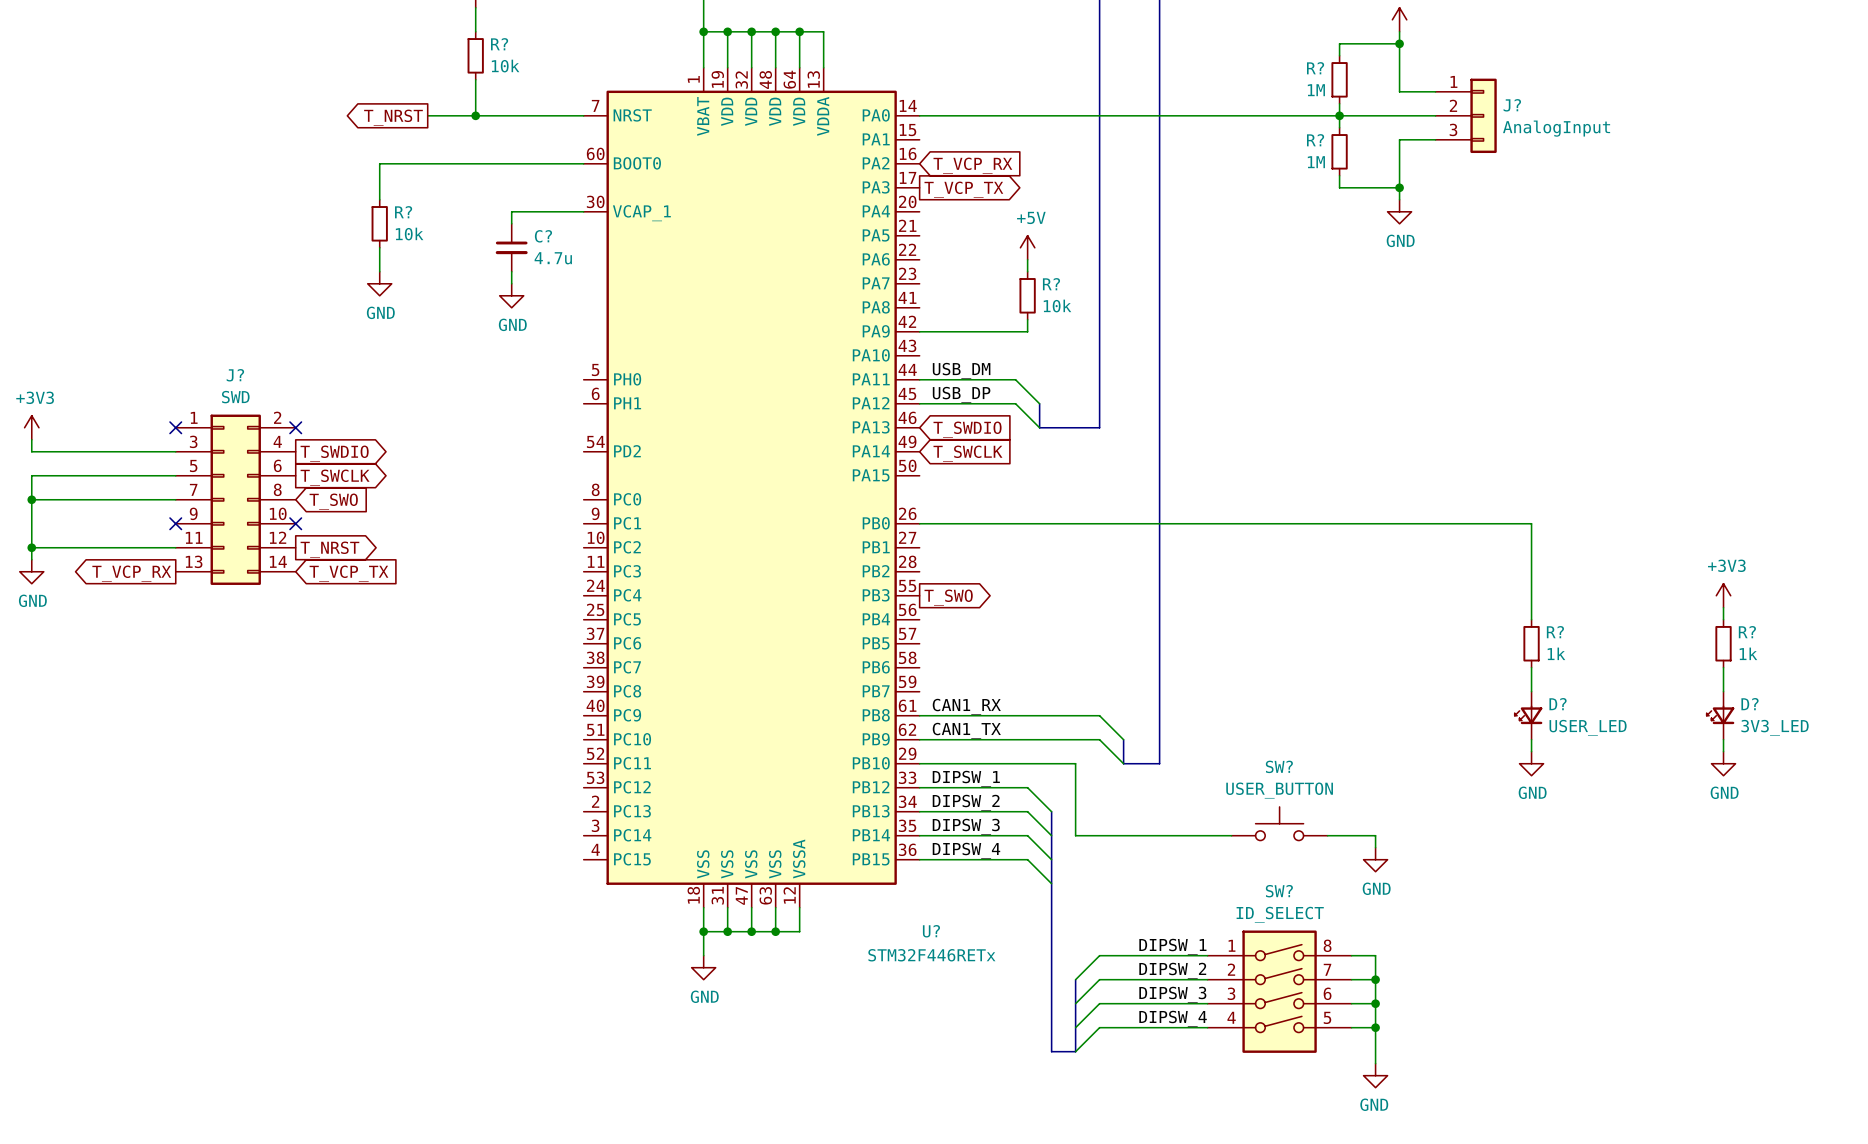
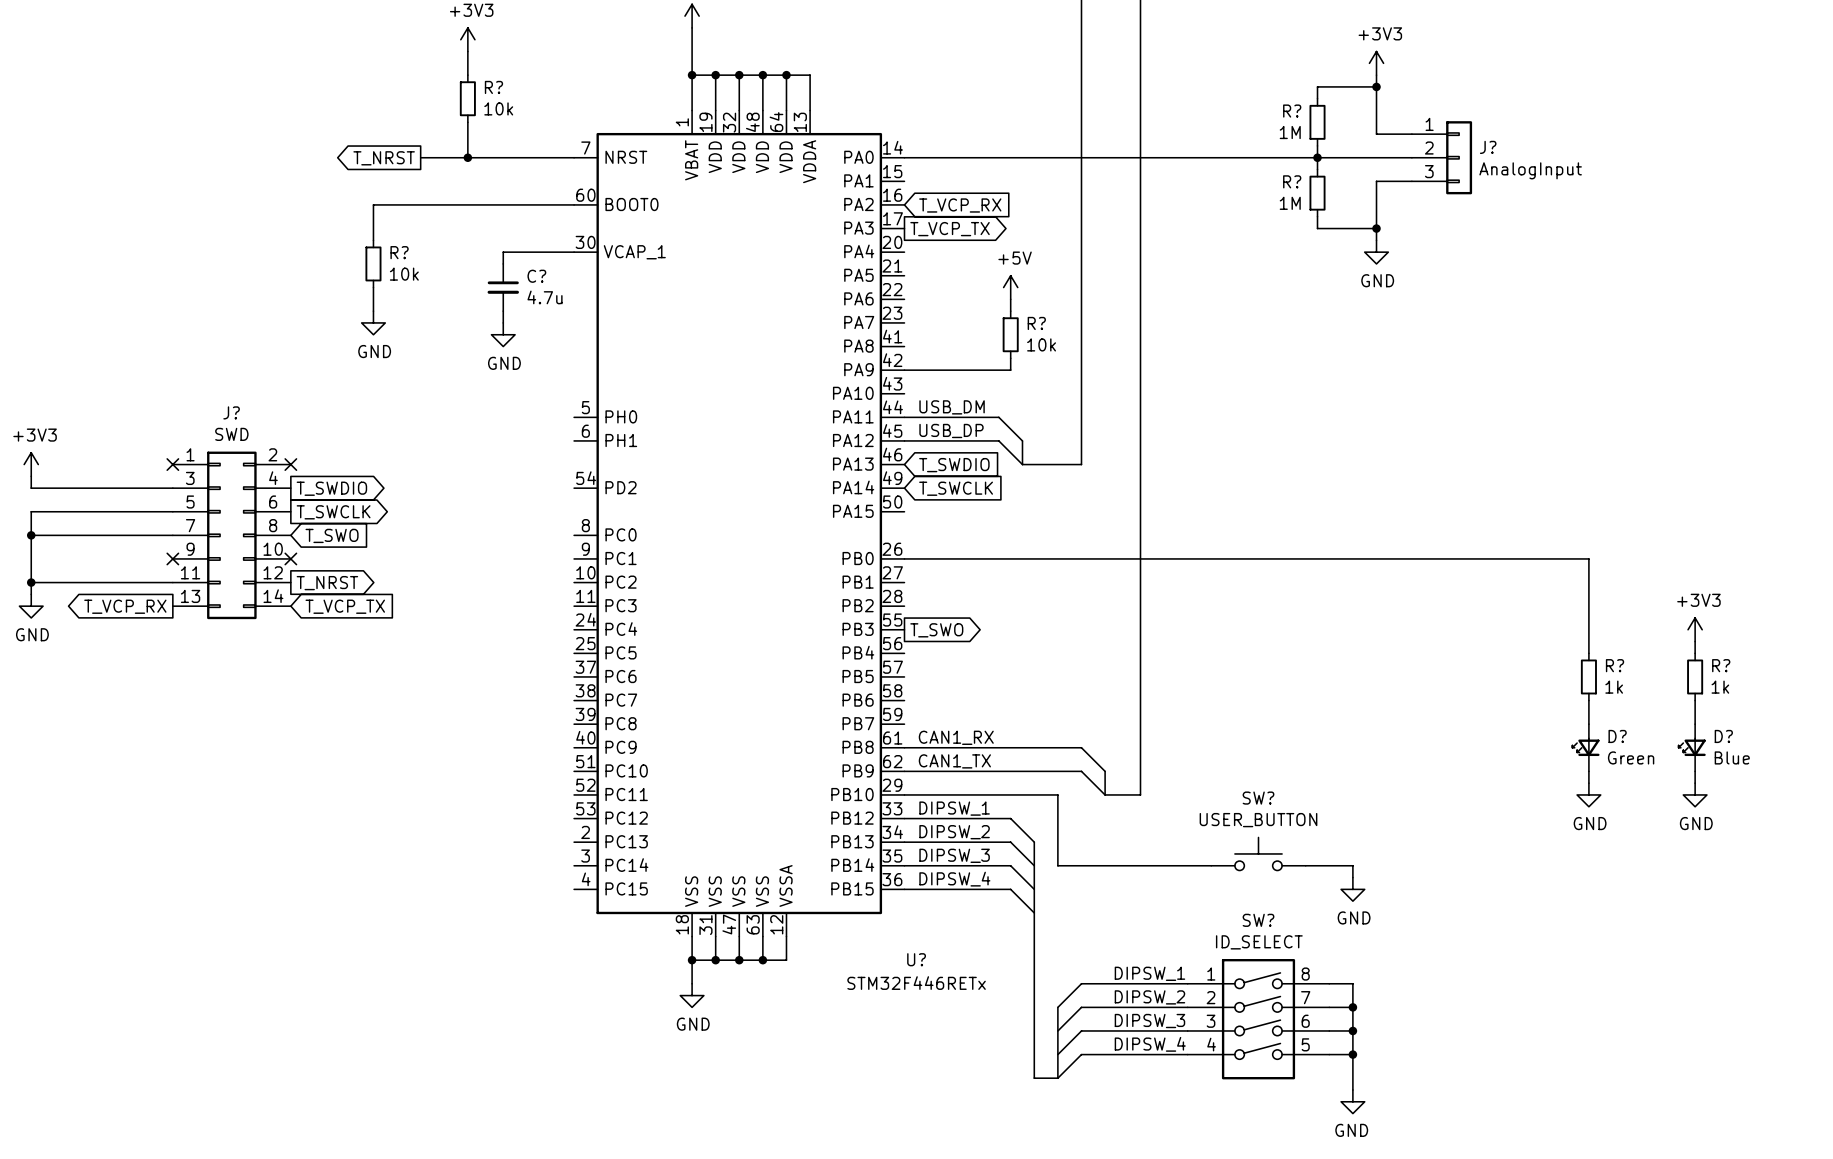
wire: (1531, 523) (1531, 619) -> (1506, 558) (1588, 558) (1588, 653)
R? position: (1531, 643) -> (1588, 676)
wire: (1531, 667) (1531, 691) -> (1588, 700) (1588, 724)
D?: USER_LED (1528, 715) -> none
D?: none -> Green (1585, 747)
D? value: 3V3_LED (1775, 727) -> Blue (1732, 757)
wire: (1531, 739) (1531, 751) -> (1588, 771) (1588, 783)
power symbol position: GND (1531, 763) -> GND (1588, 794)

